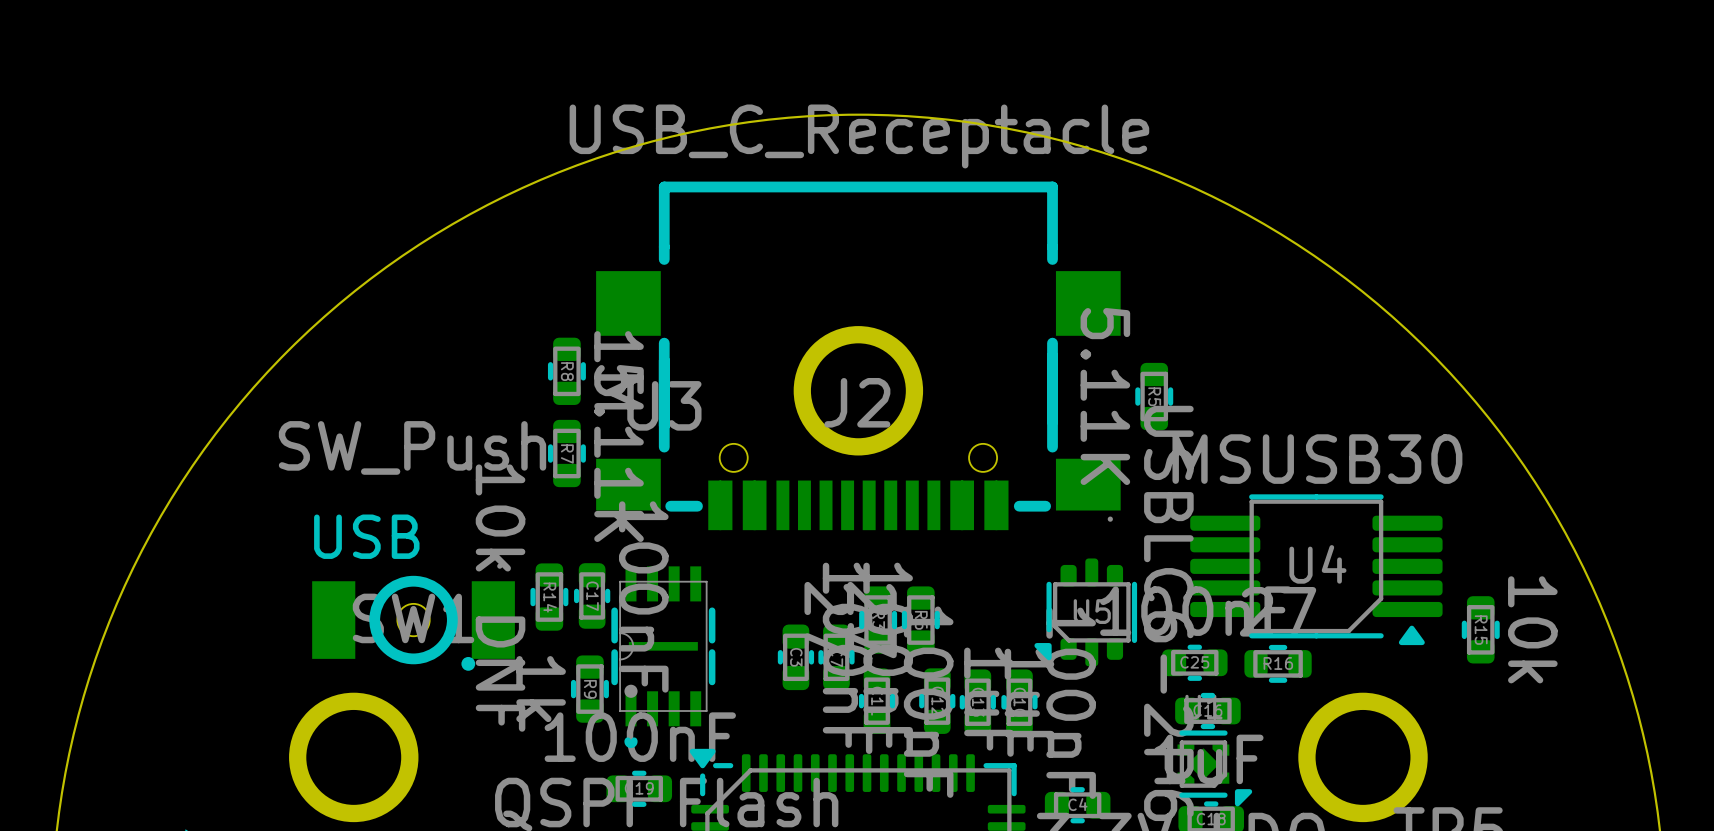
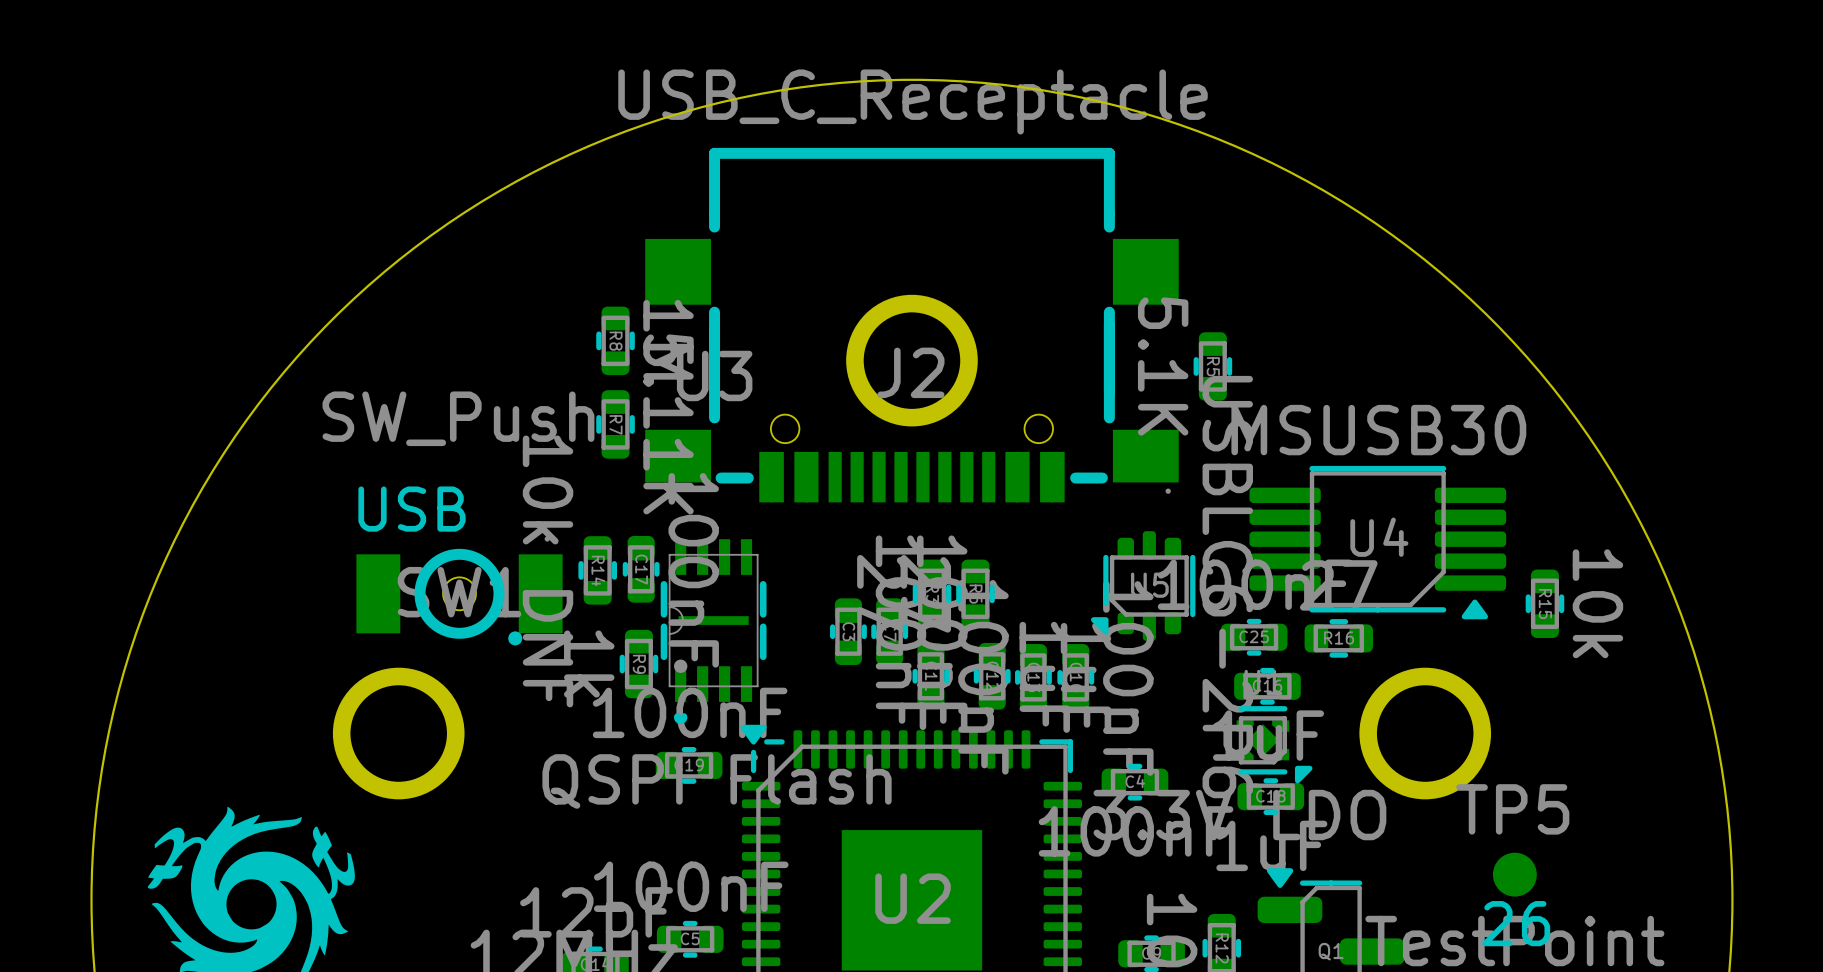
R5 value: 5.11K (1105, 396) -> 5.1K (1163, 366)

